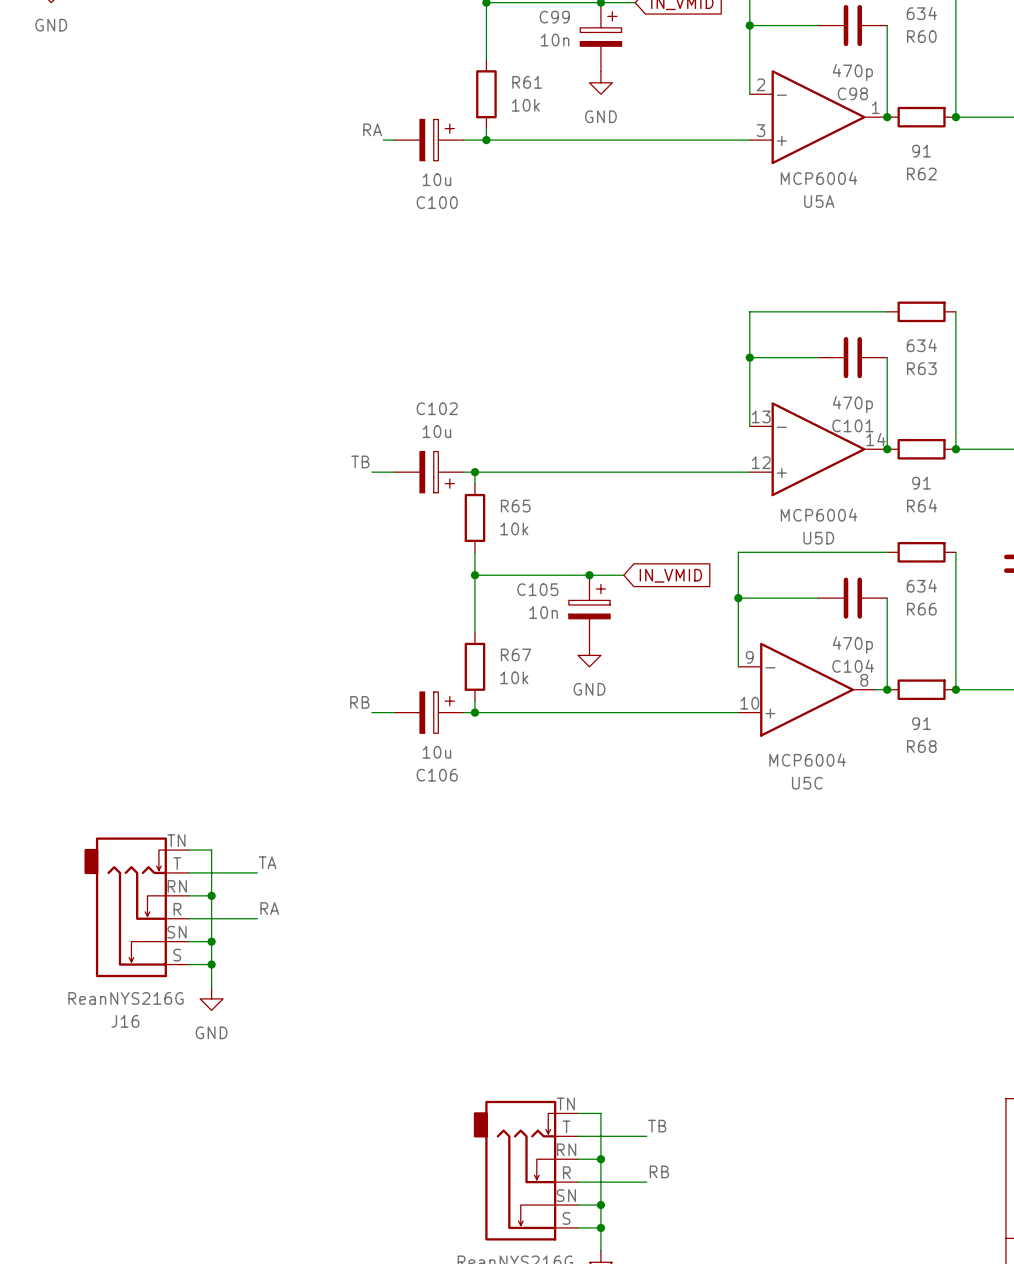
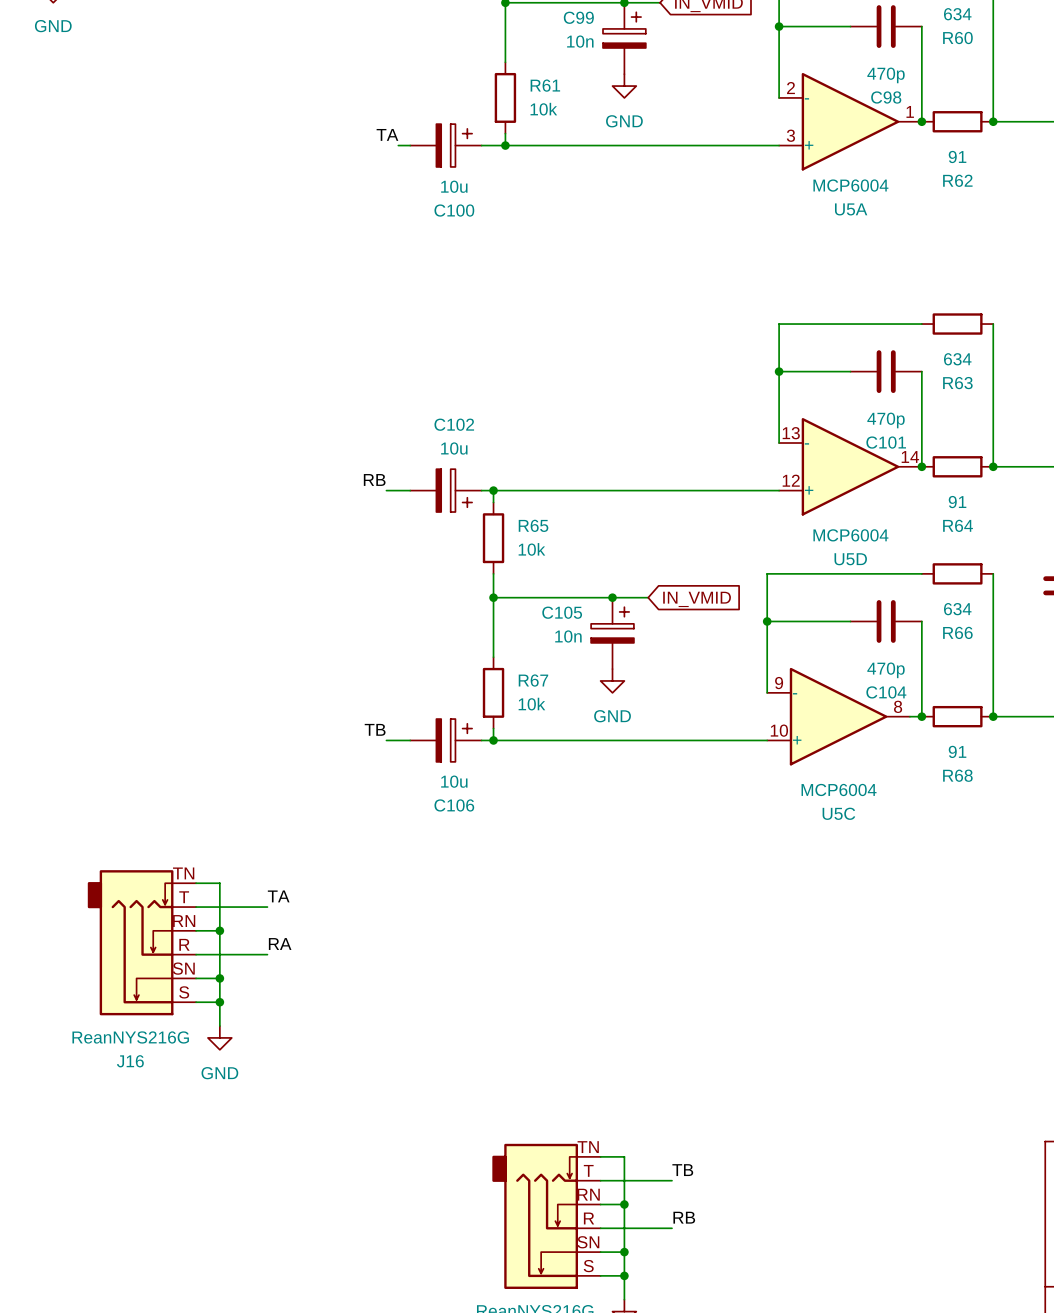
label: RA (372, 129) -> TA (387, 134)
label: TB (360, 461) -> RB (374, 479)
label: RB (359, 702) -> TB (375, 729)

